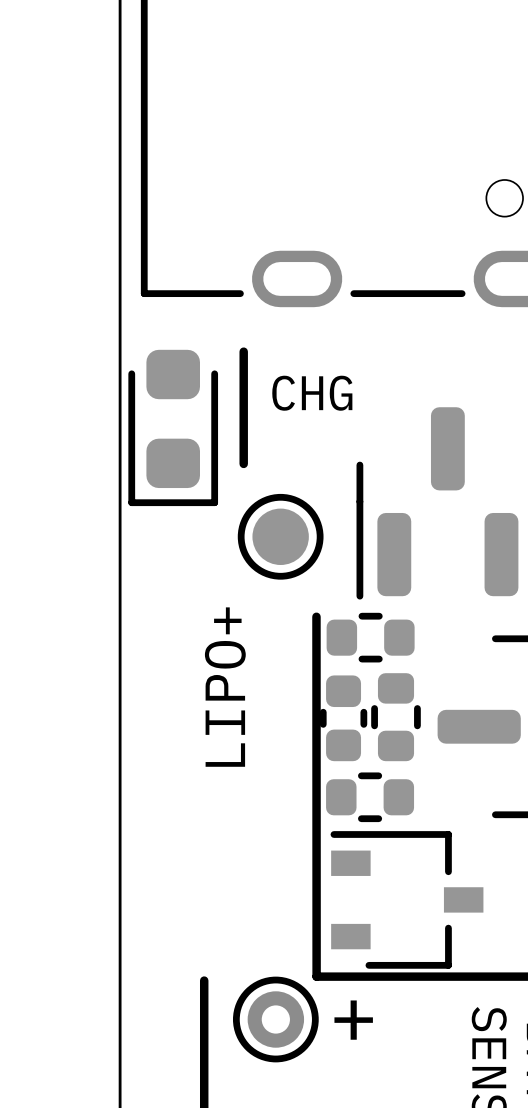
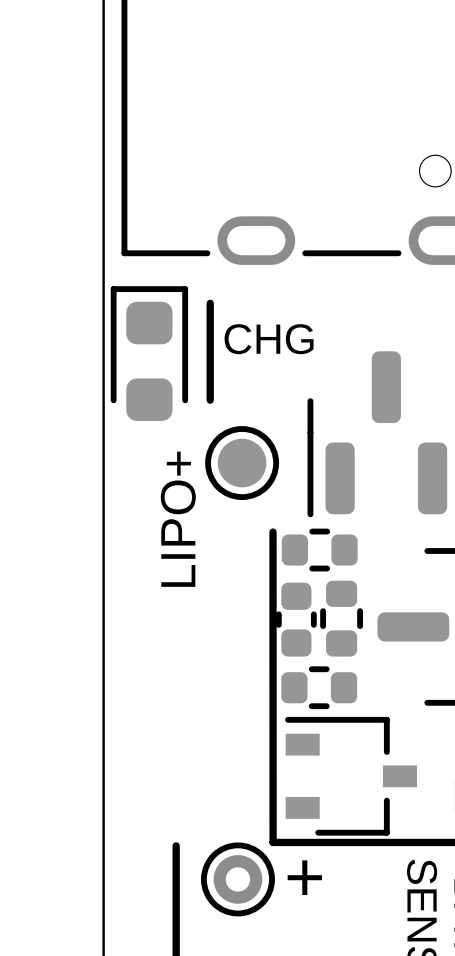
part rotation: 0° (173, 427) -> 180° (149, 353)
text position: LIPO+ (225, 687) -> LIPO+ (178, 519)

